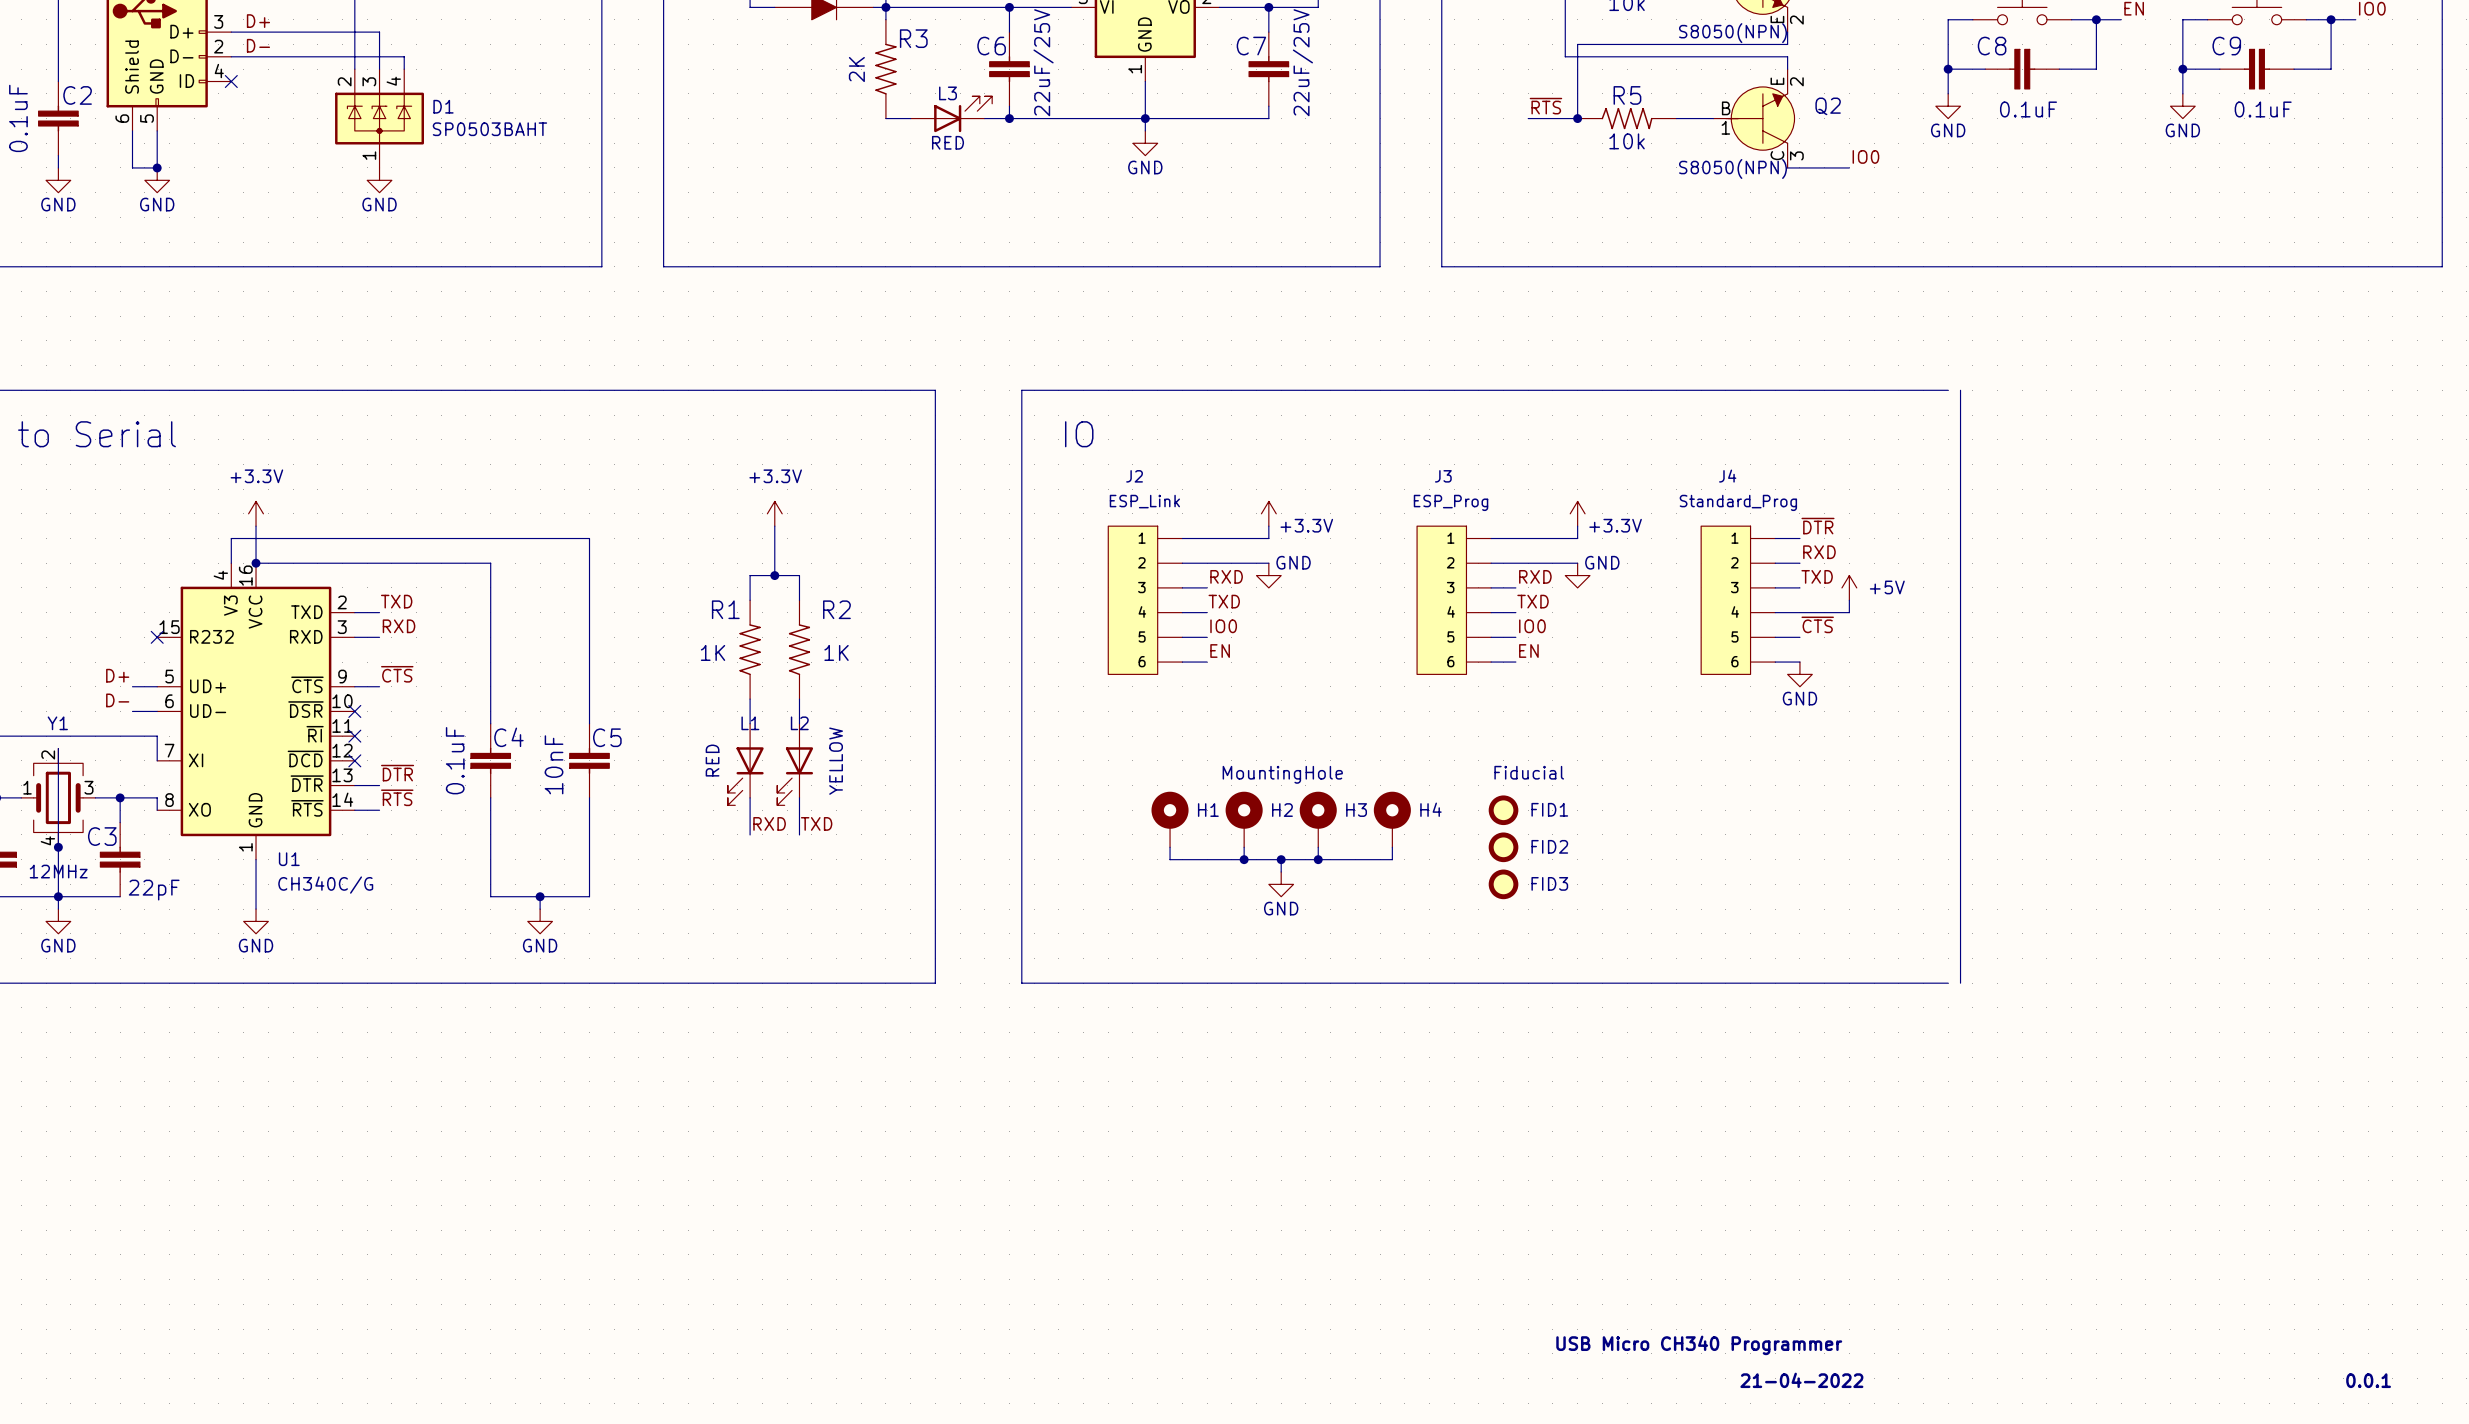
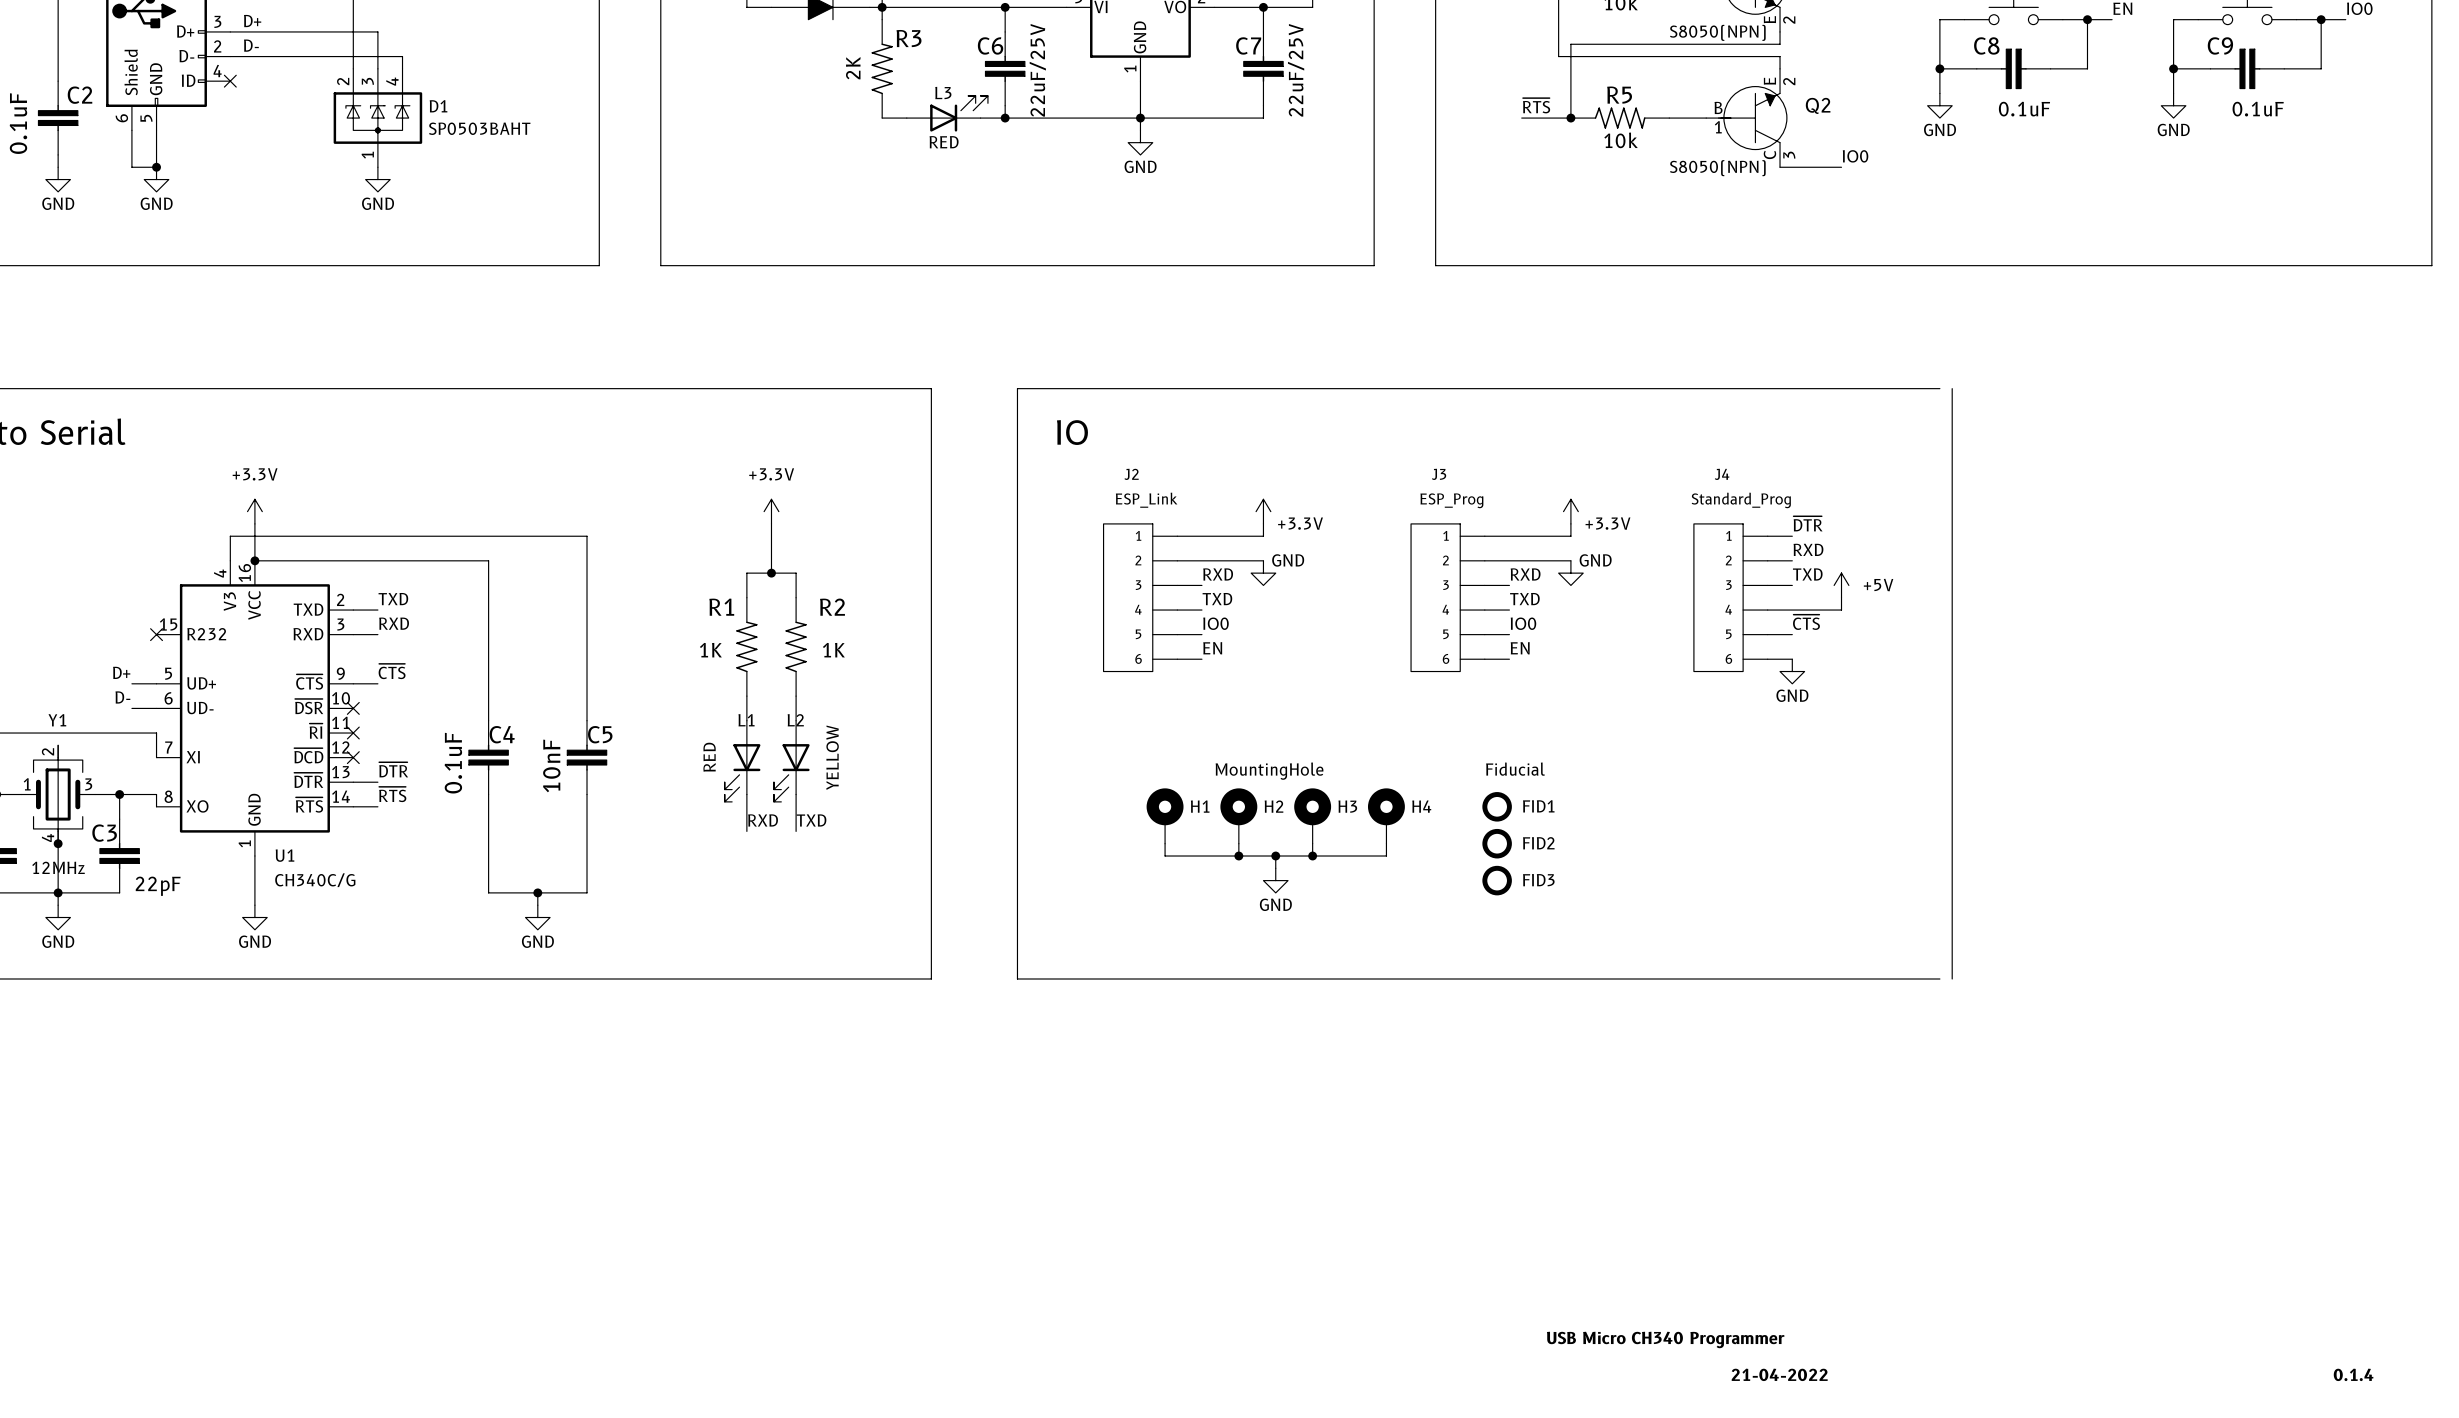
text: 0.0.1 (2368, 1380) -> 0.1.4 (2353, 1374)

